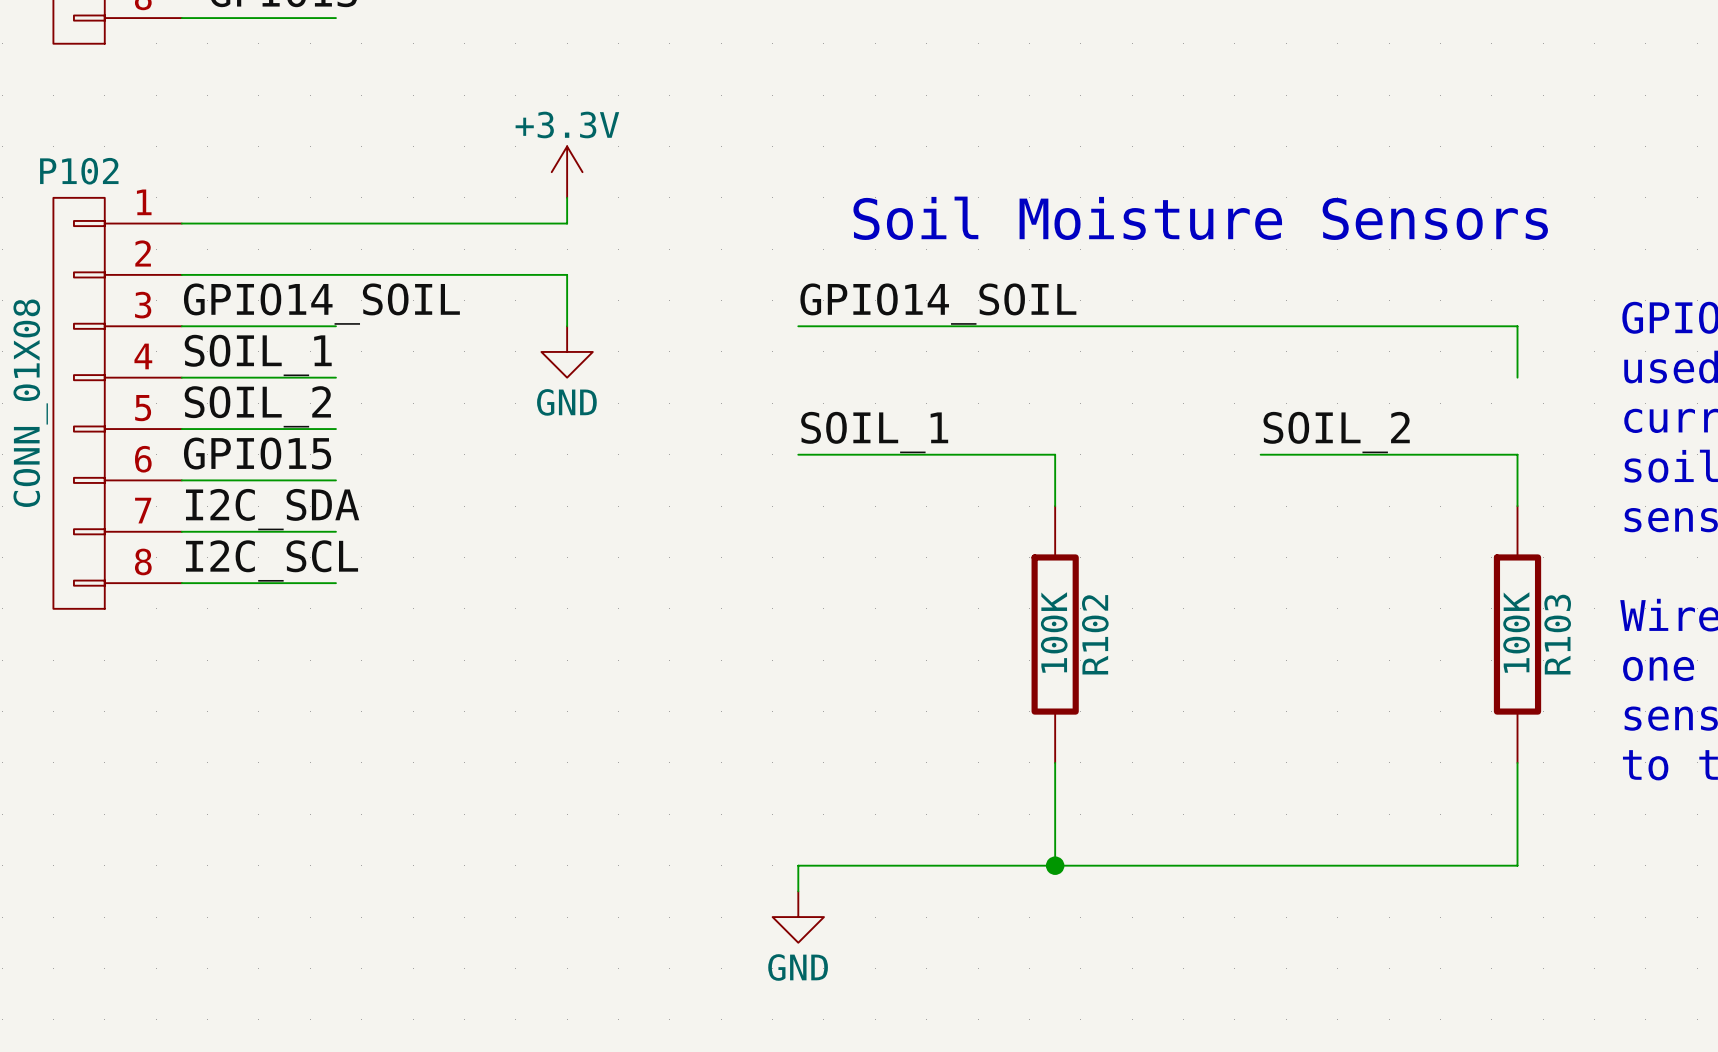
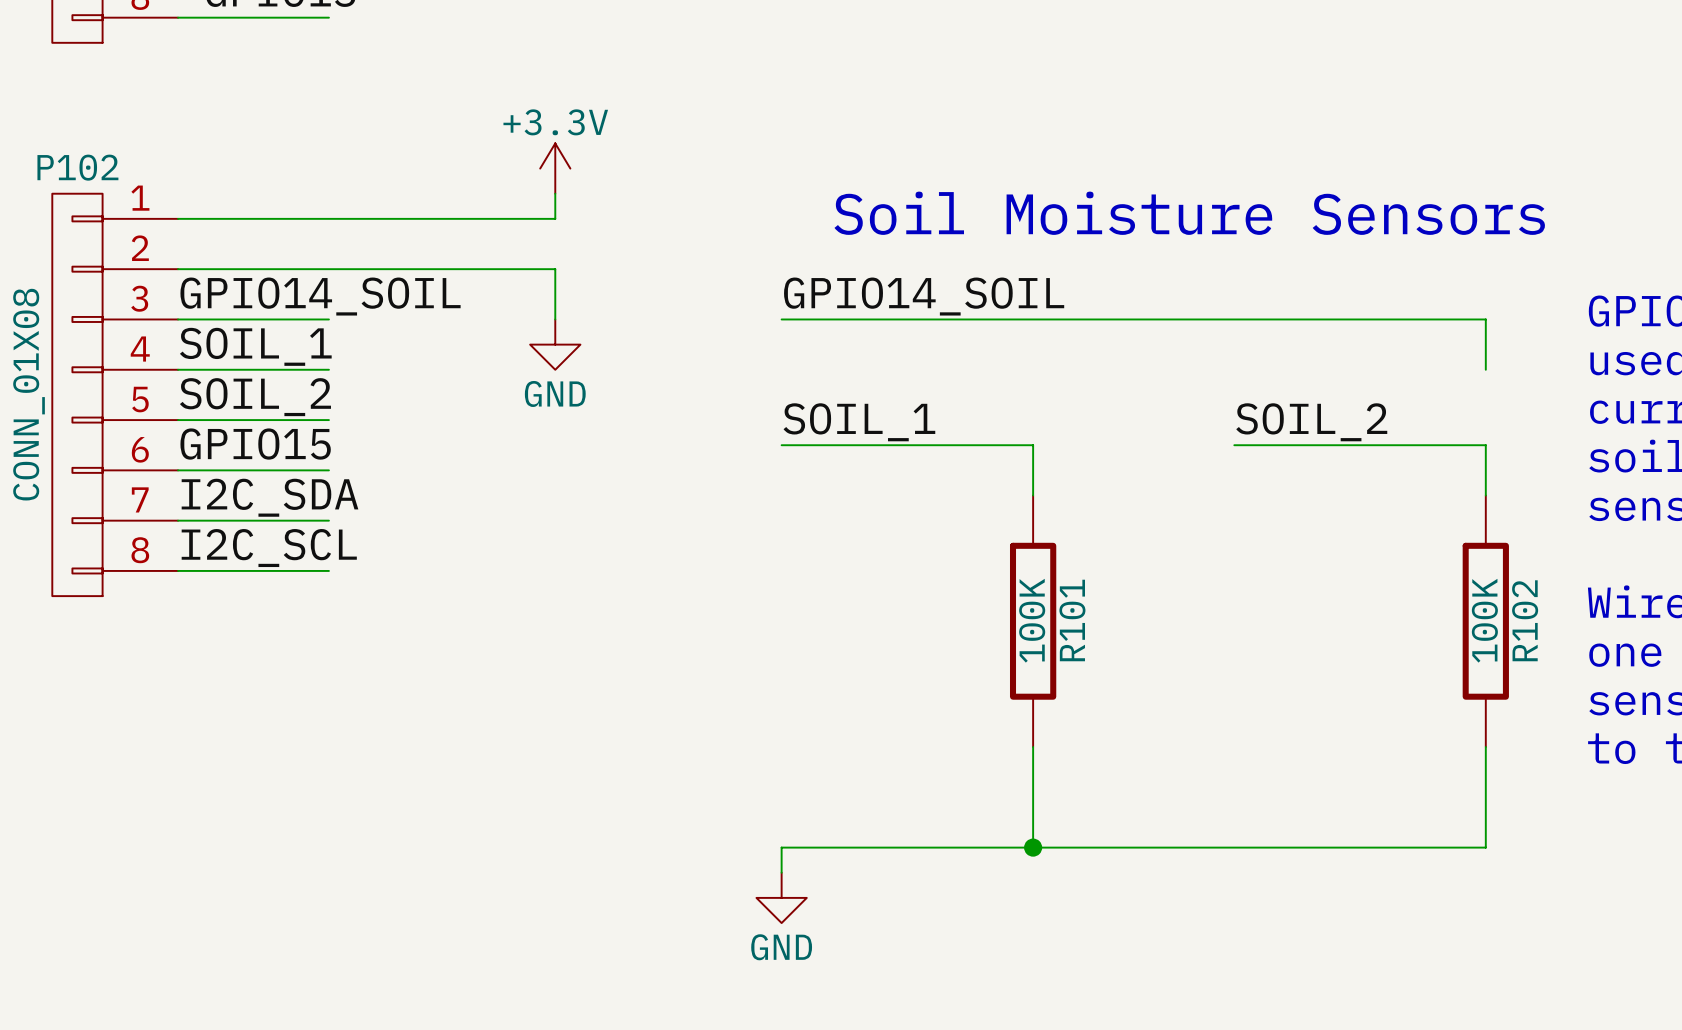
R102 name: R102 (1095, 634) -> R101 (1072, 620)
R103 name: R103 (1557, 634) -> R102 (1525, 620)

